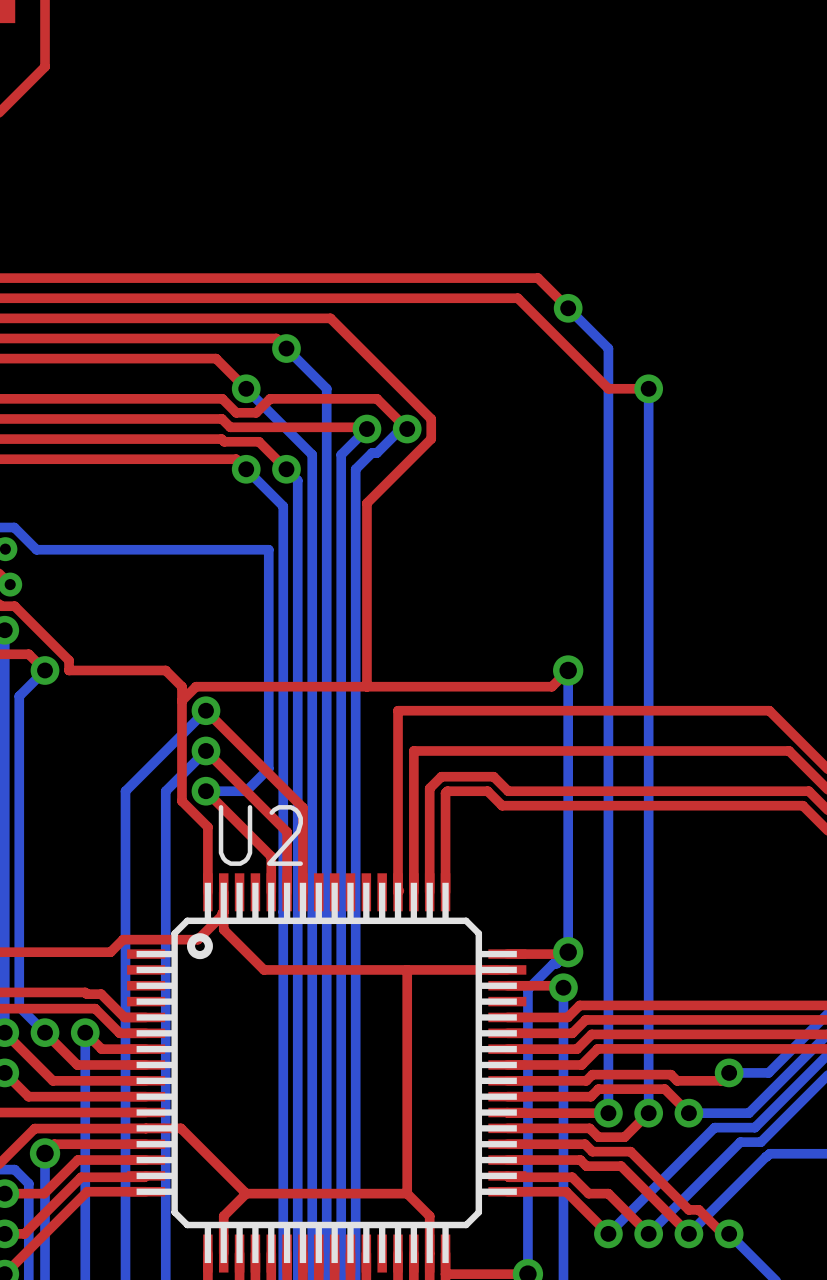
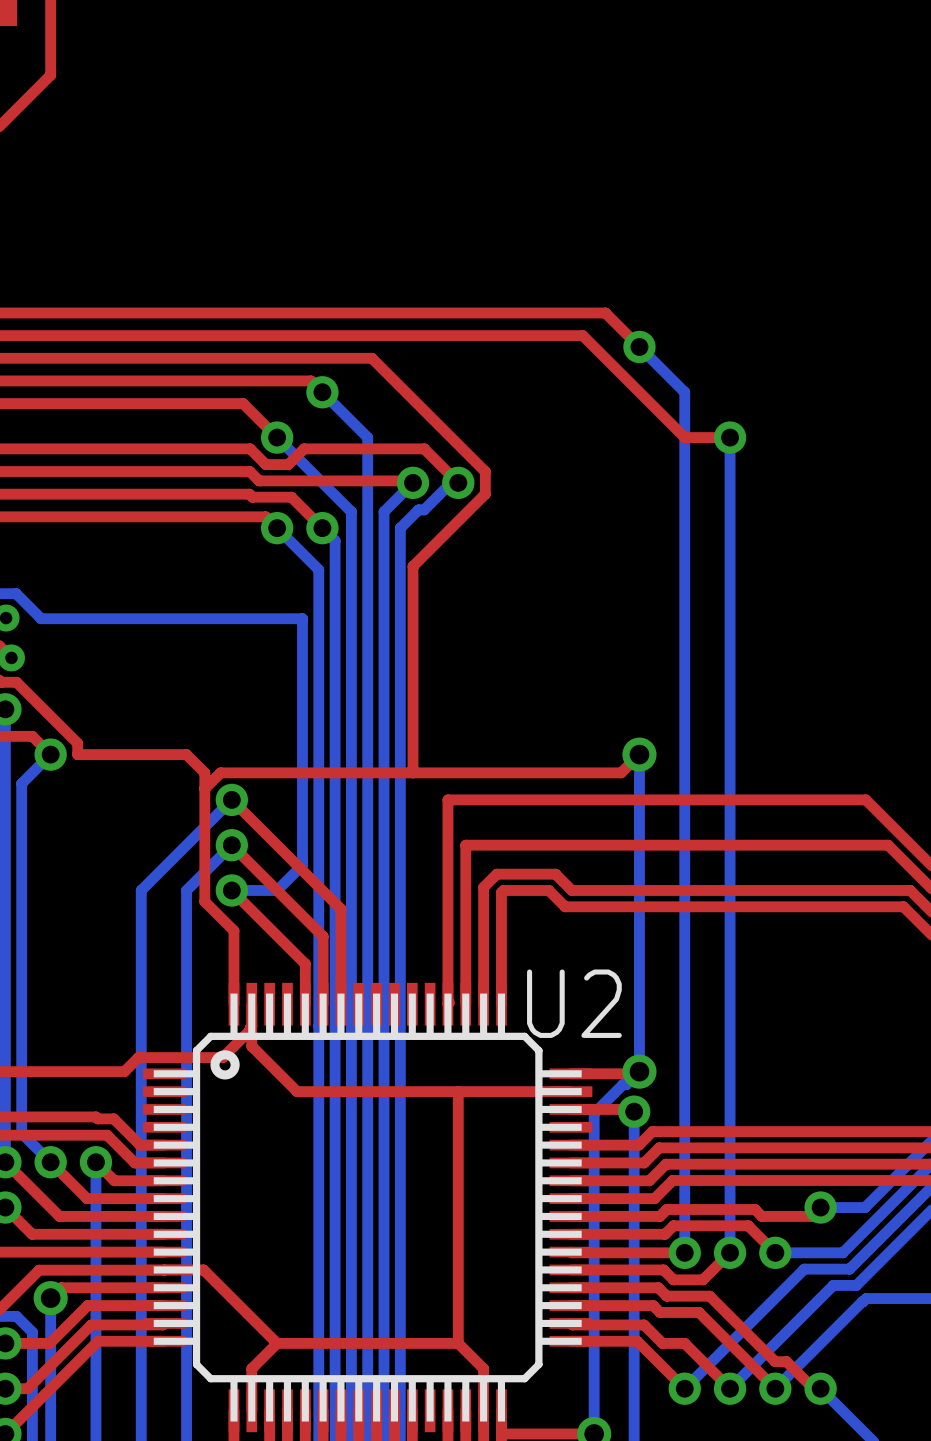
U2 name position: U2 (260, 835) -> U2 (574, 1003)

